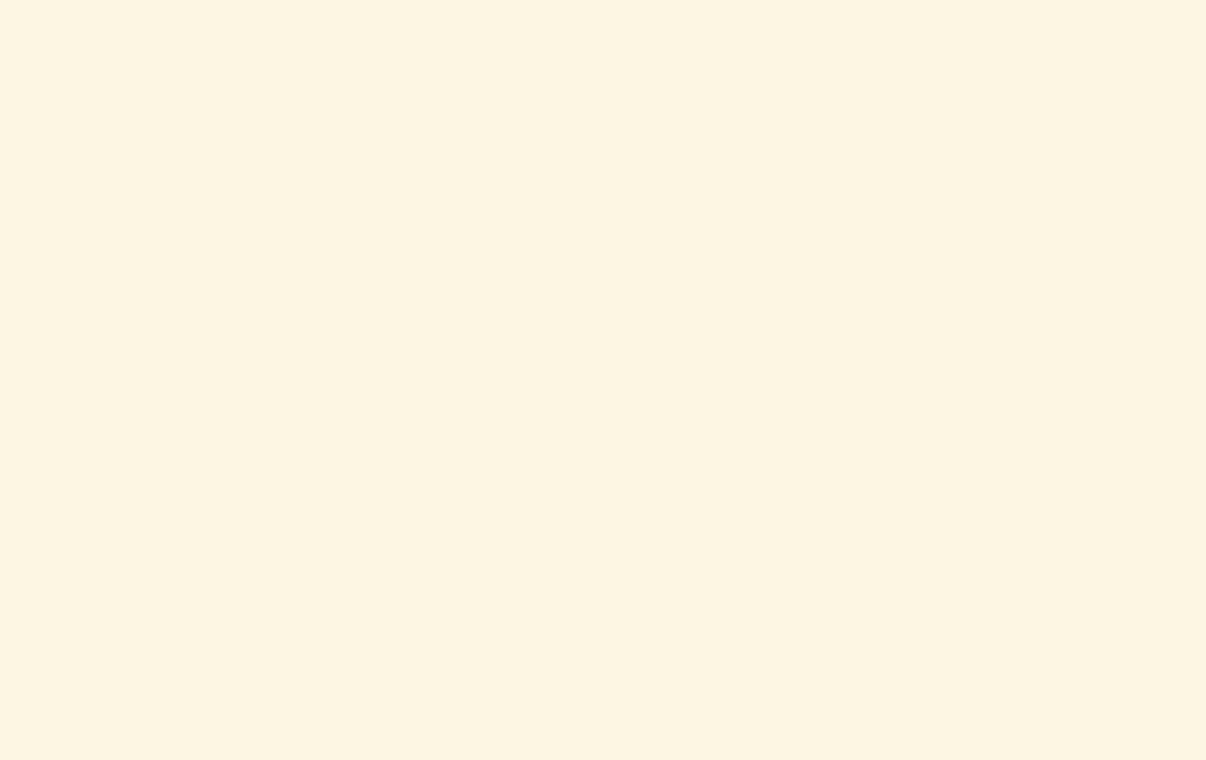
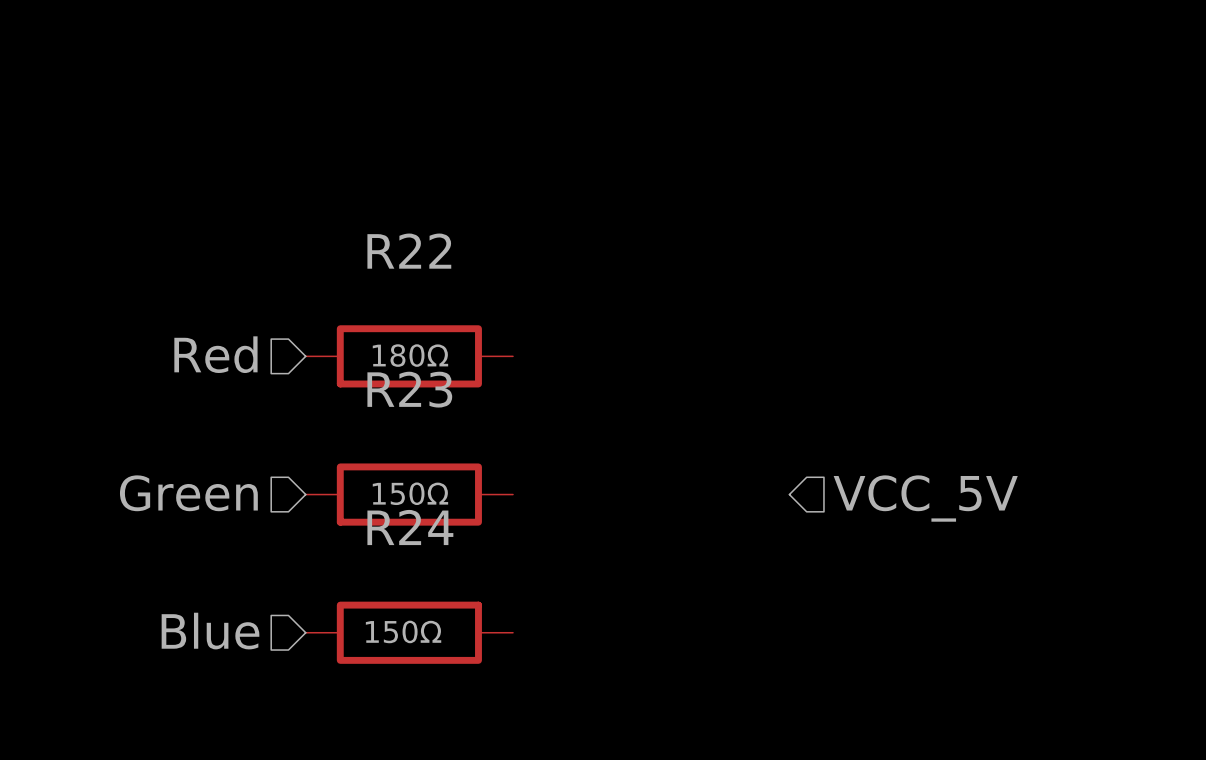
hierarchical label: none -> Red (215, 354)
R22: none -> 180Ω (409, 356)
hierarchical label: none -> Green (188, 493)
R23: none -> 150Ω (409, 494)
hierarchical label: none -> VCC_5V (925, 498)
hierarchical label: none -> Blue (210, 631)
R24: none -> 150Ω (409, 632)

